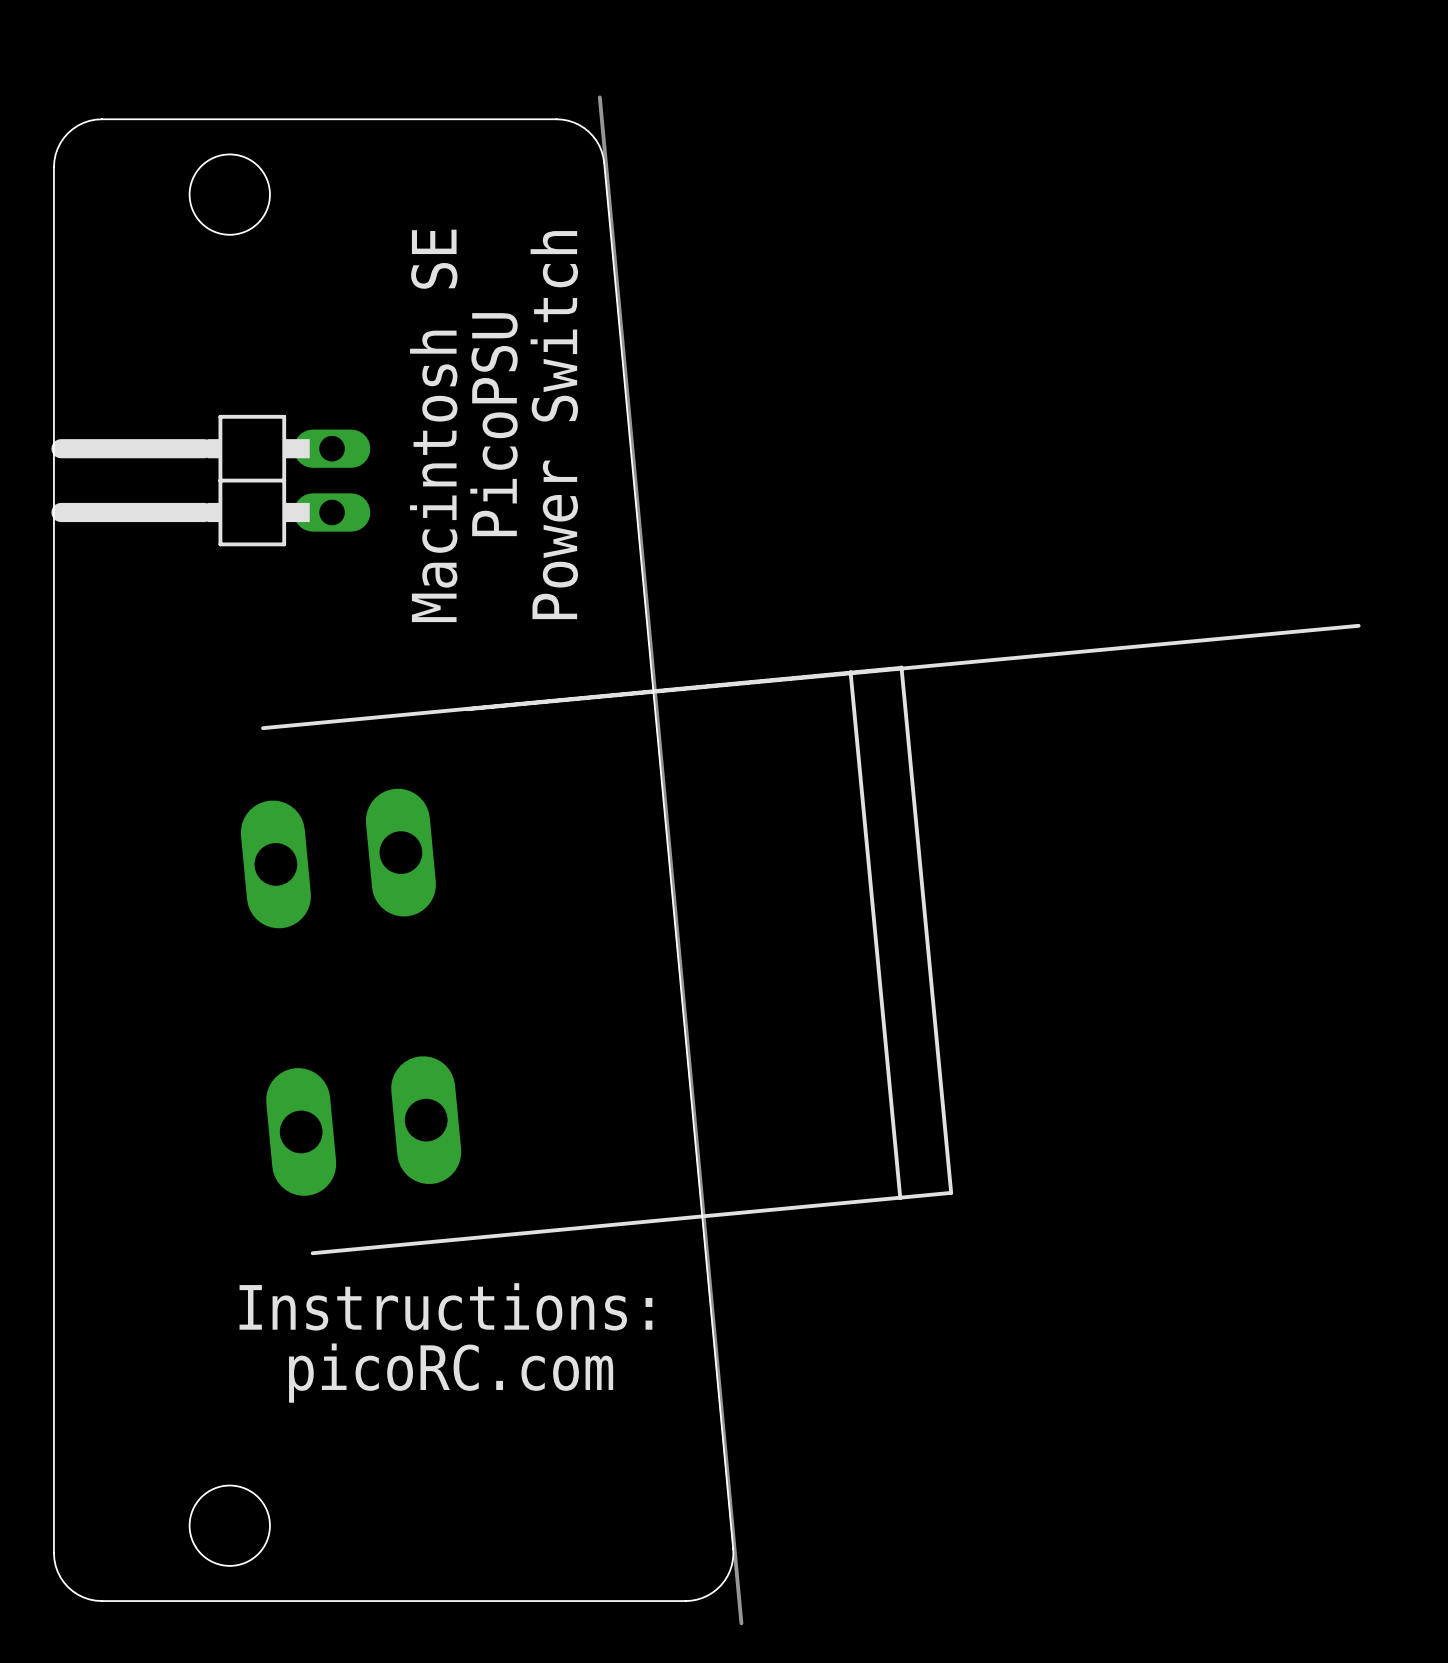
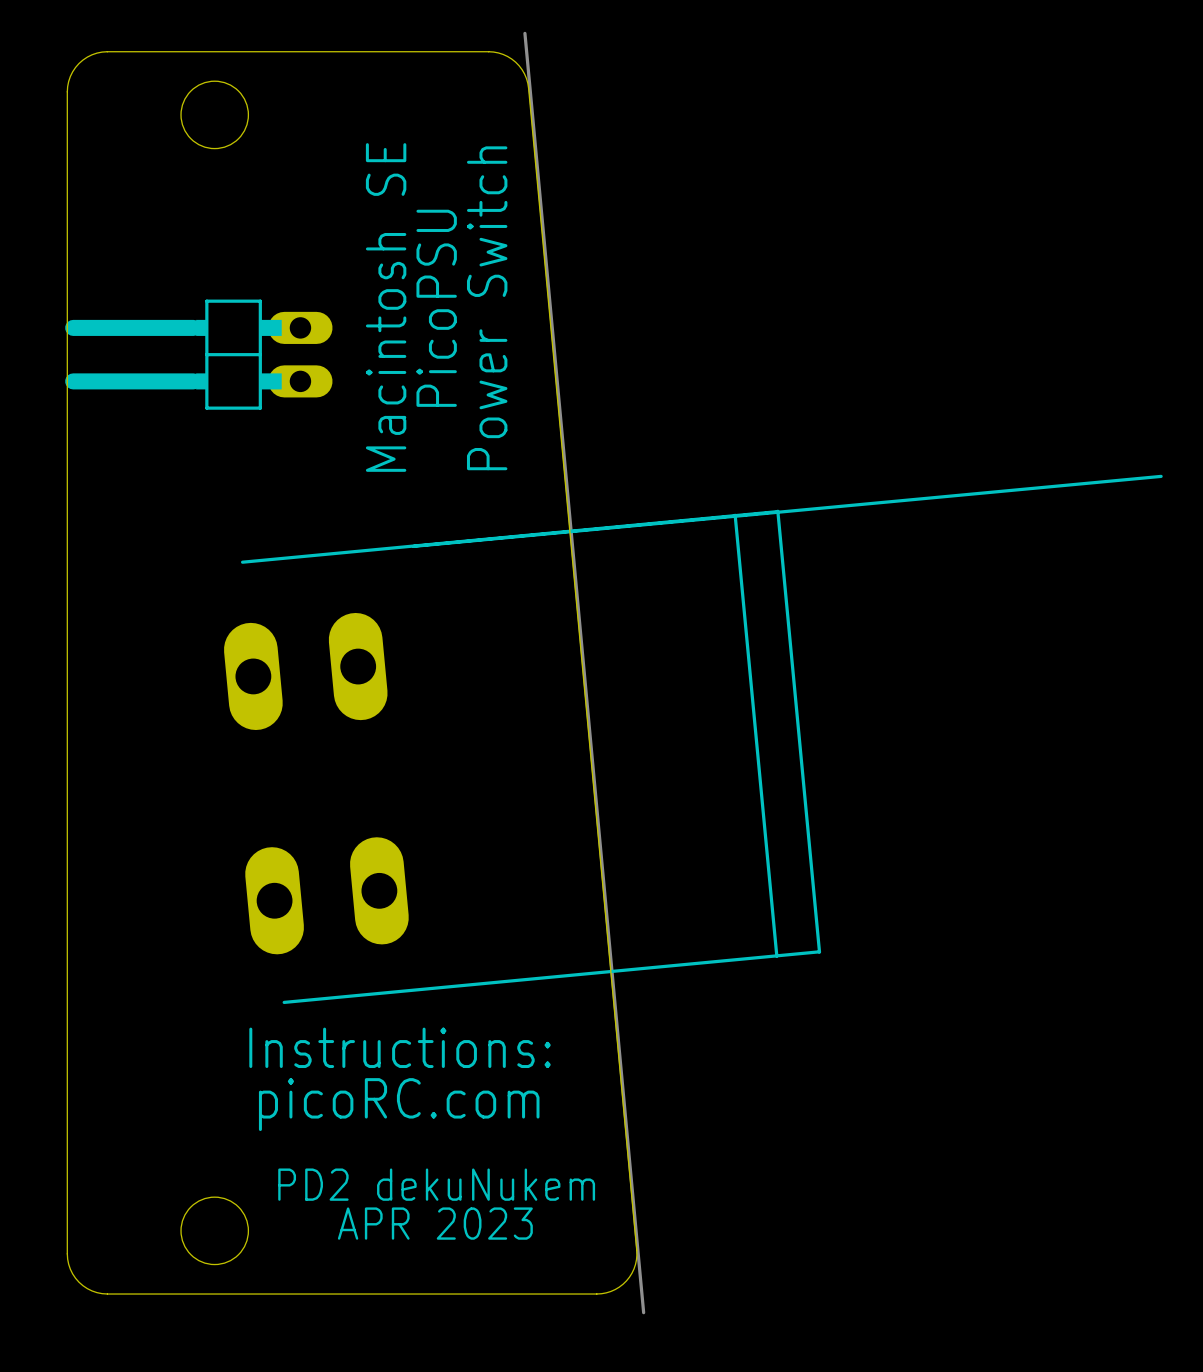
text: none -> PD2 dekuNukem (436, 1184)
text: none -> APR 2023 (435, 1223)

